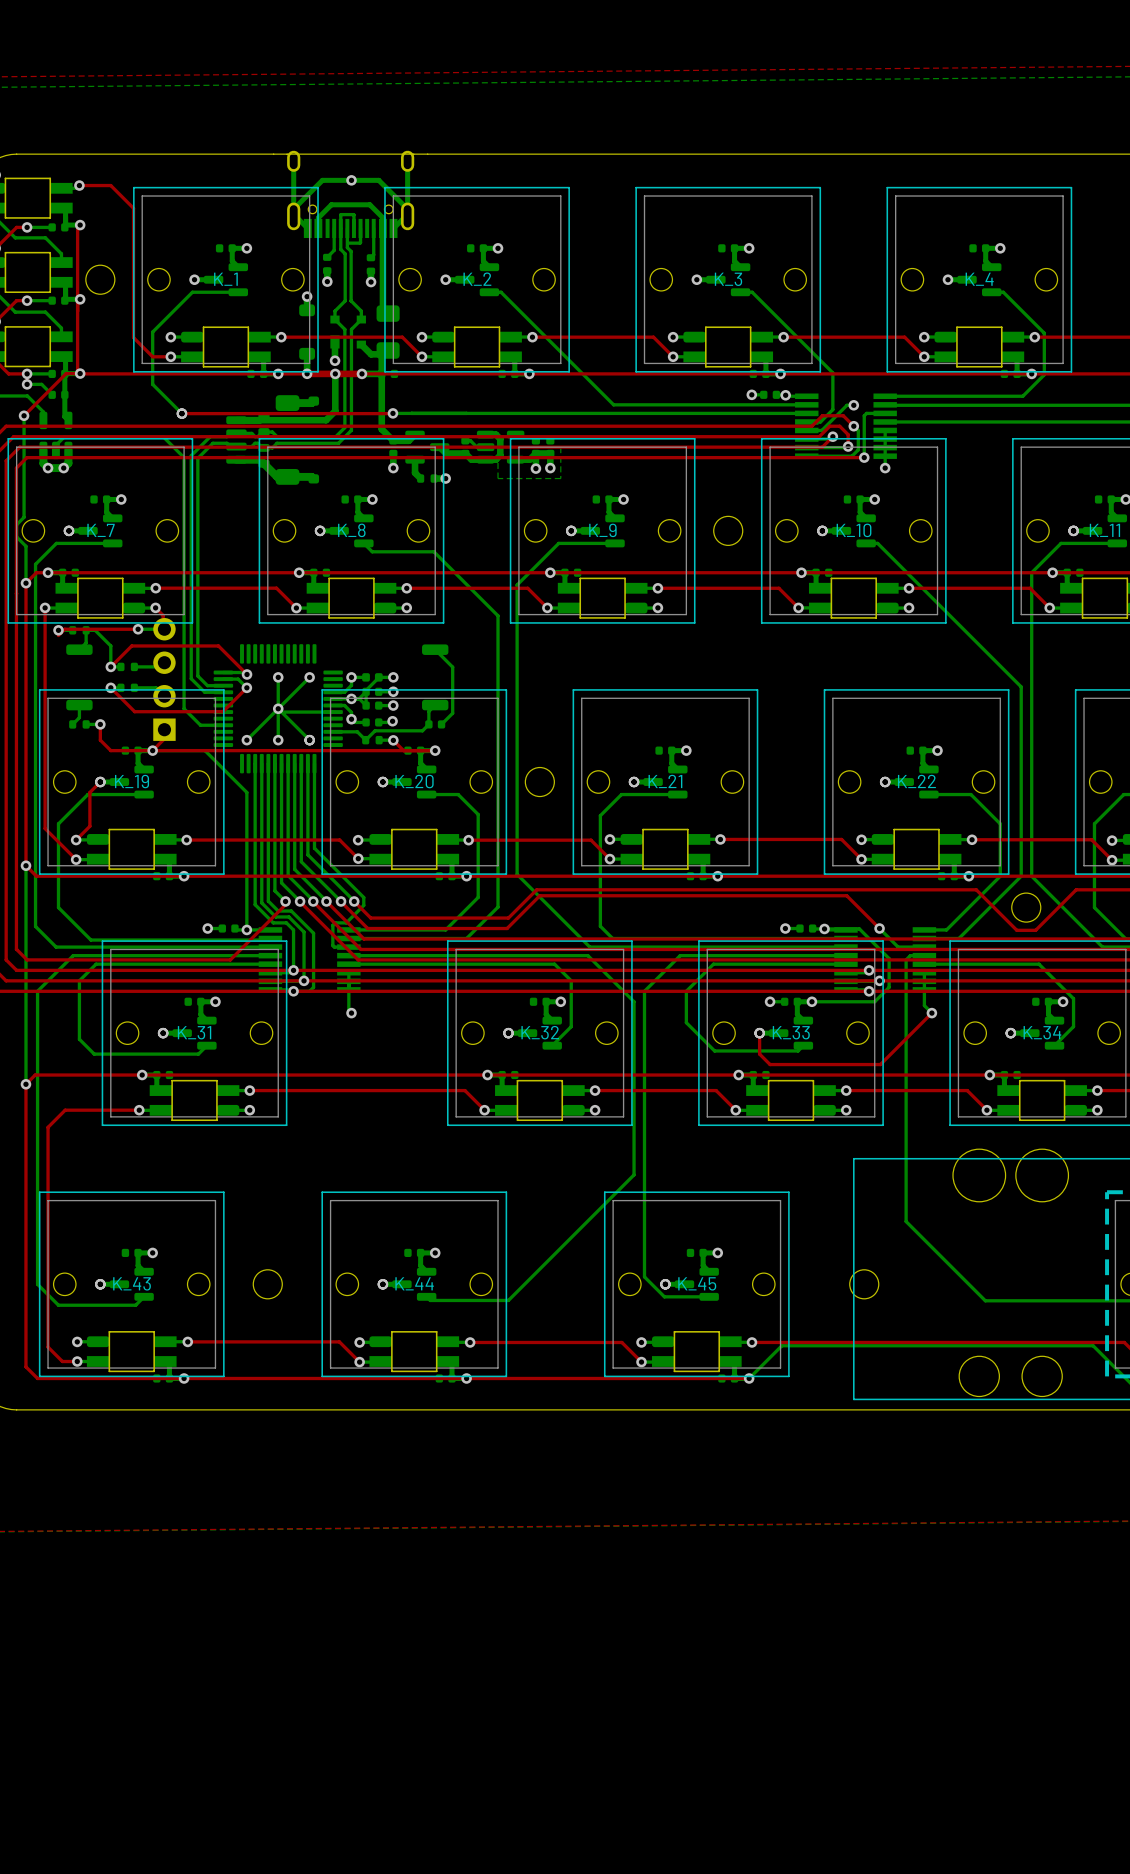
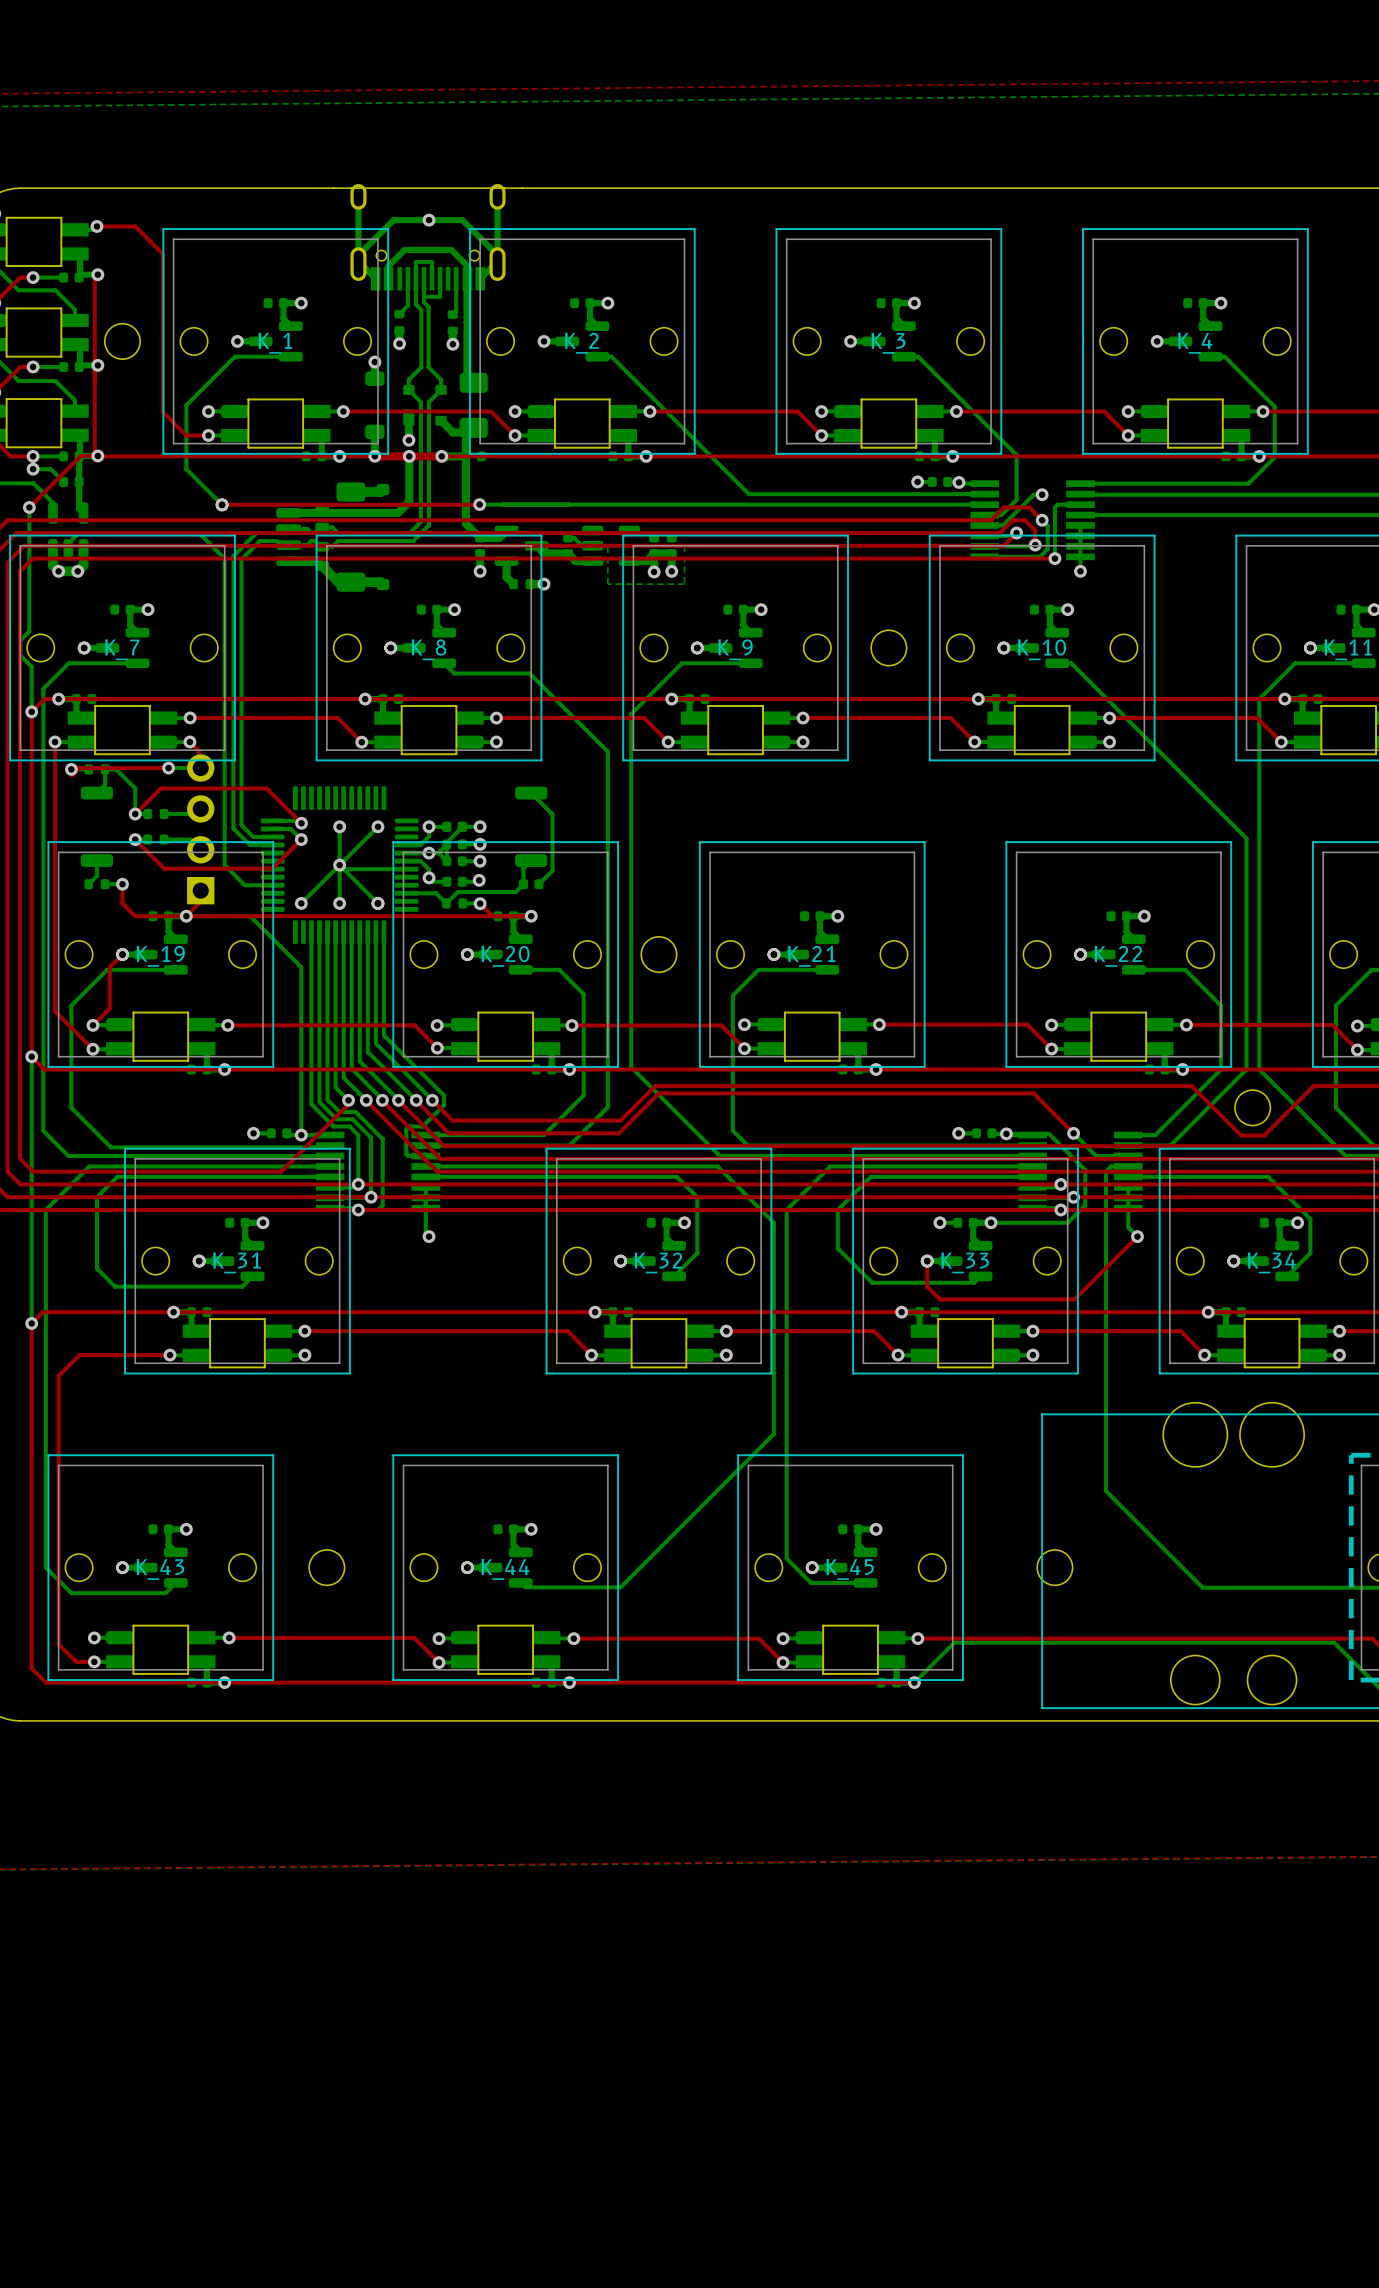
bottom track: (485, 434) (495, 434) (500, 439) (500, 455) (495, 459) (485, 459) -> none

